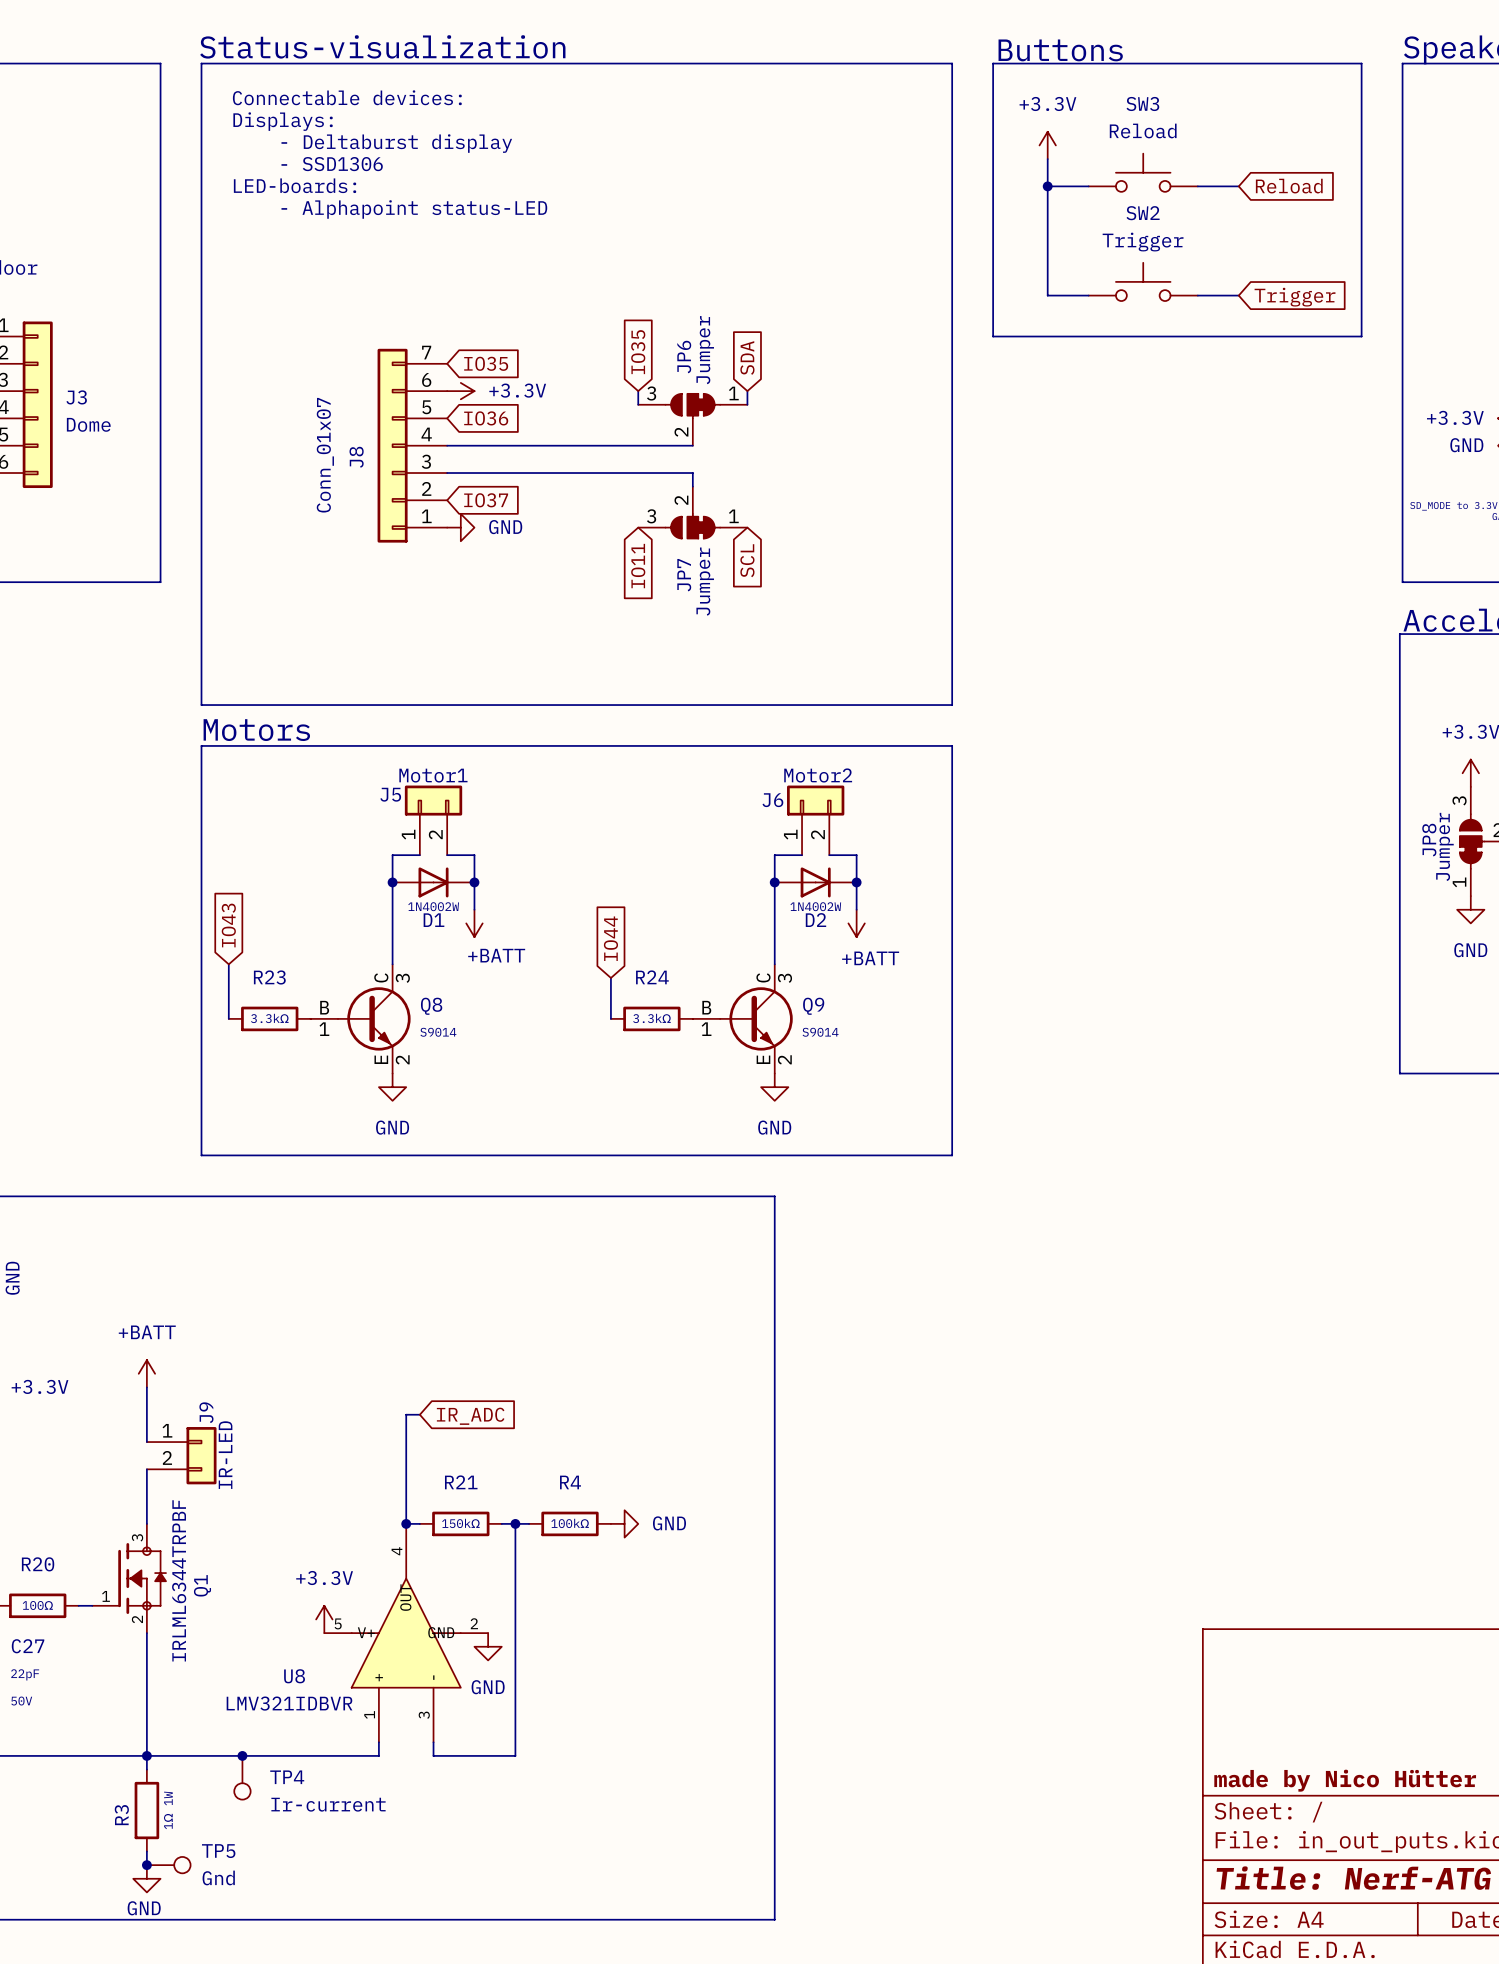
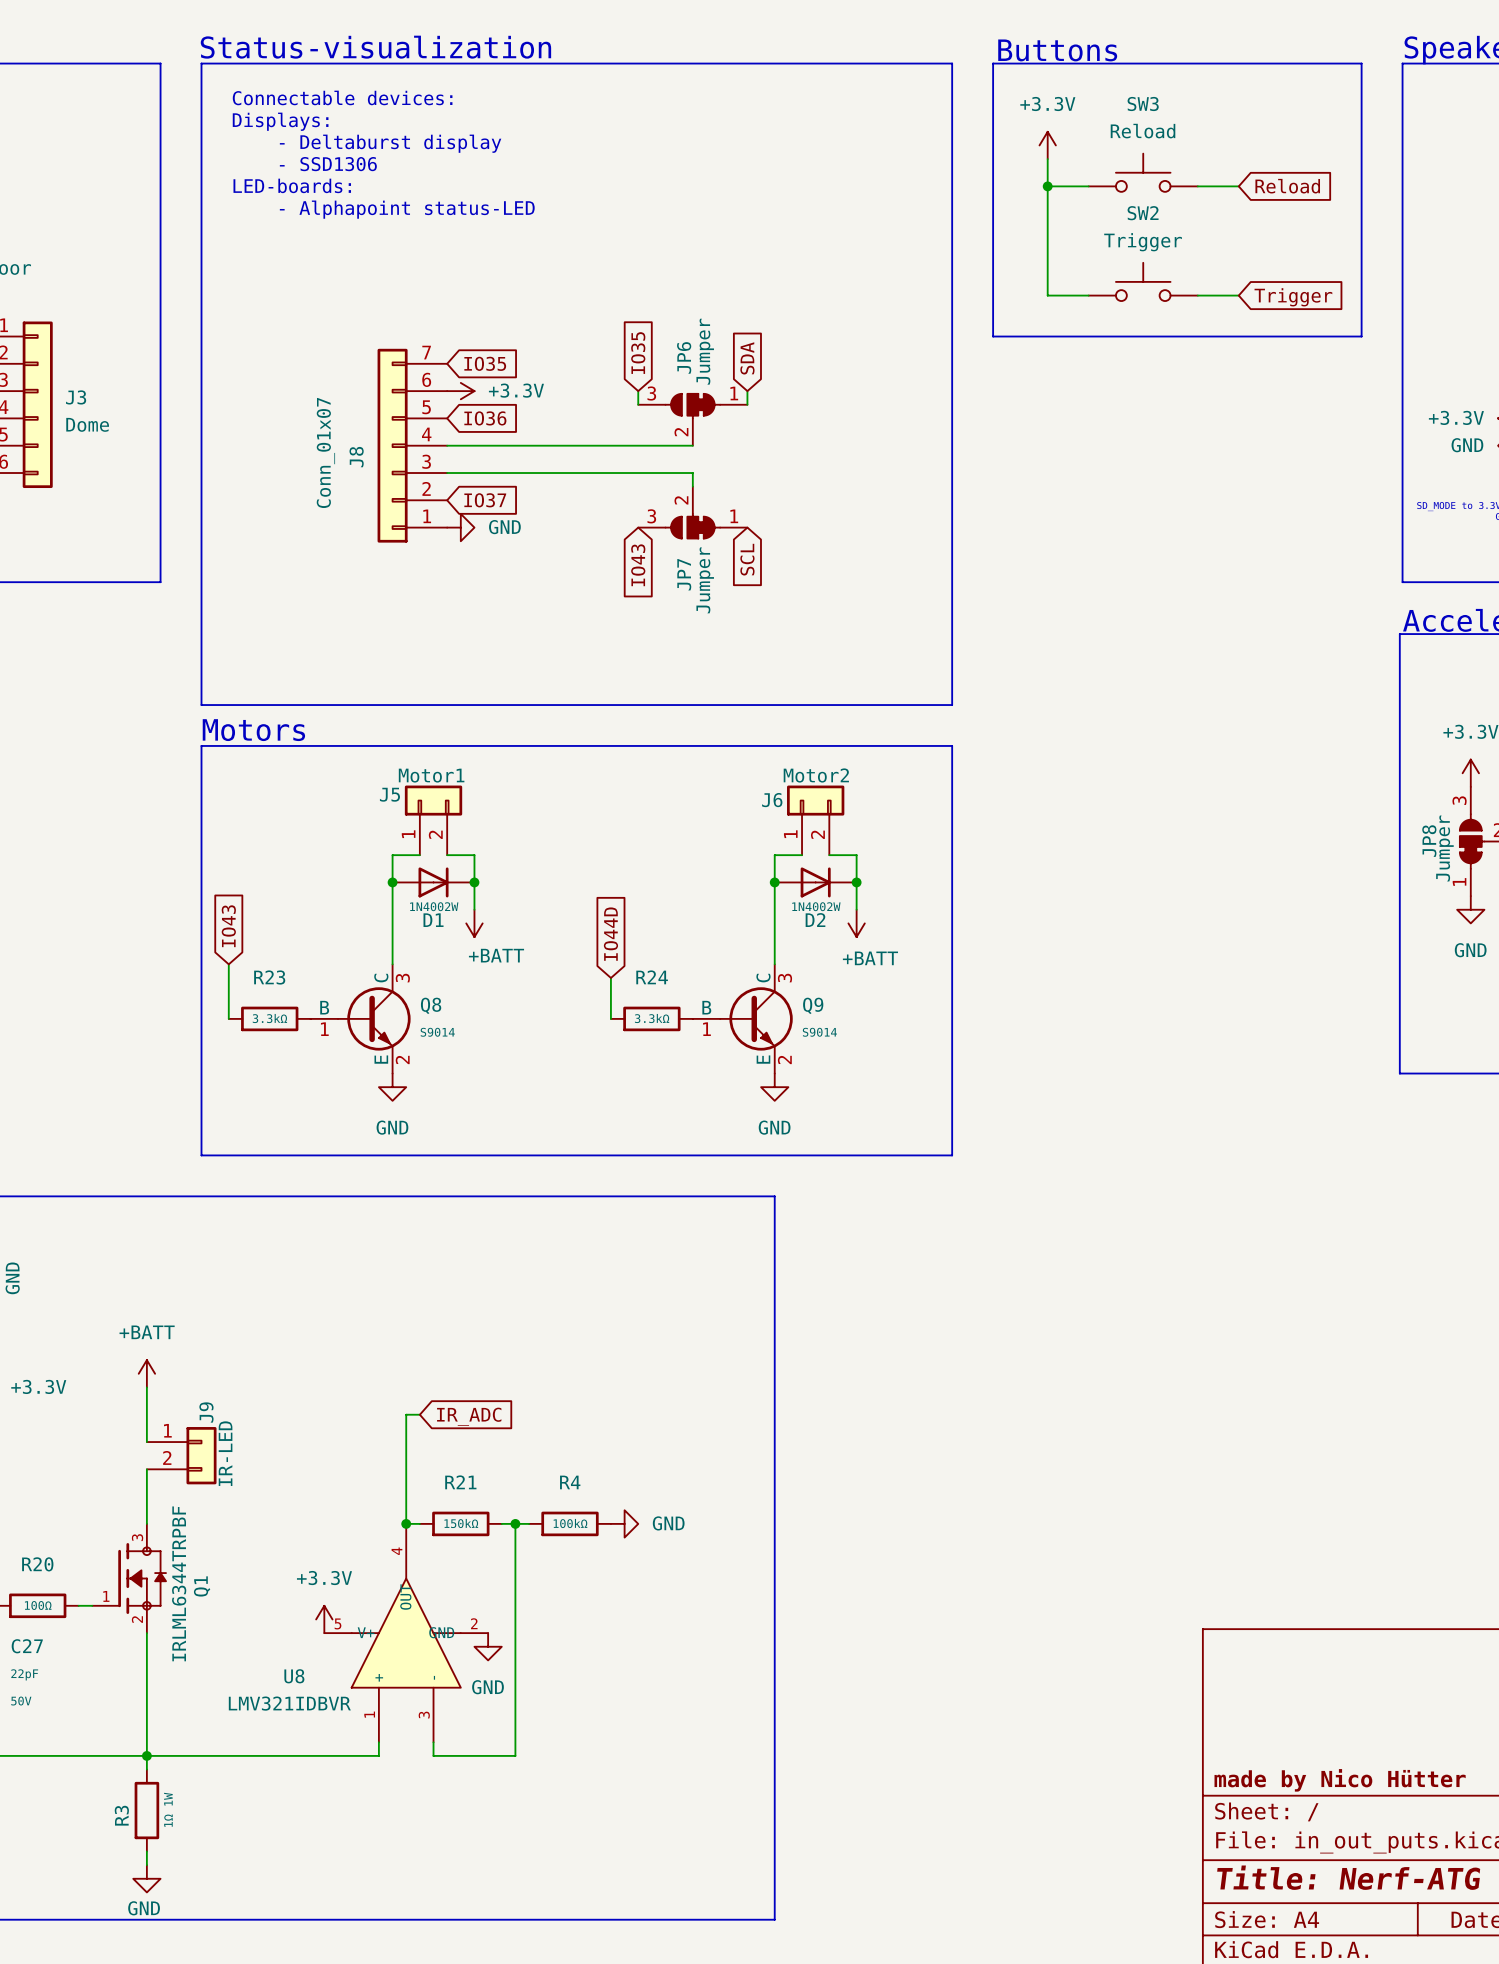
global label: IO11 (638, 566) -> IO43 (638, 565)
global label: IO44 (610, 938) -> IO44D (610, 934)
junction: (242, 1755) -> none
TP4: Ir-current (242, 1777) -> none
junction: (146, 1865) -> none
TP5: Gnd (168, 1865) -> none

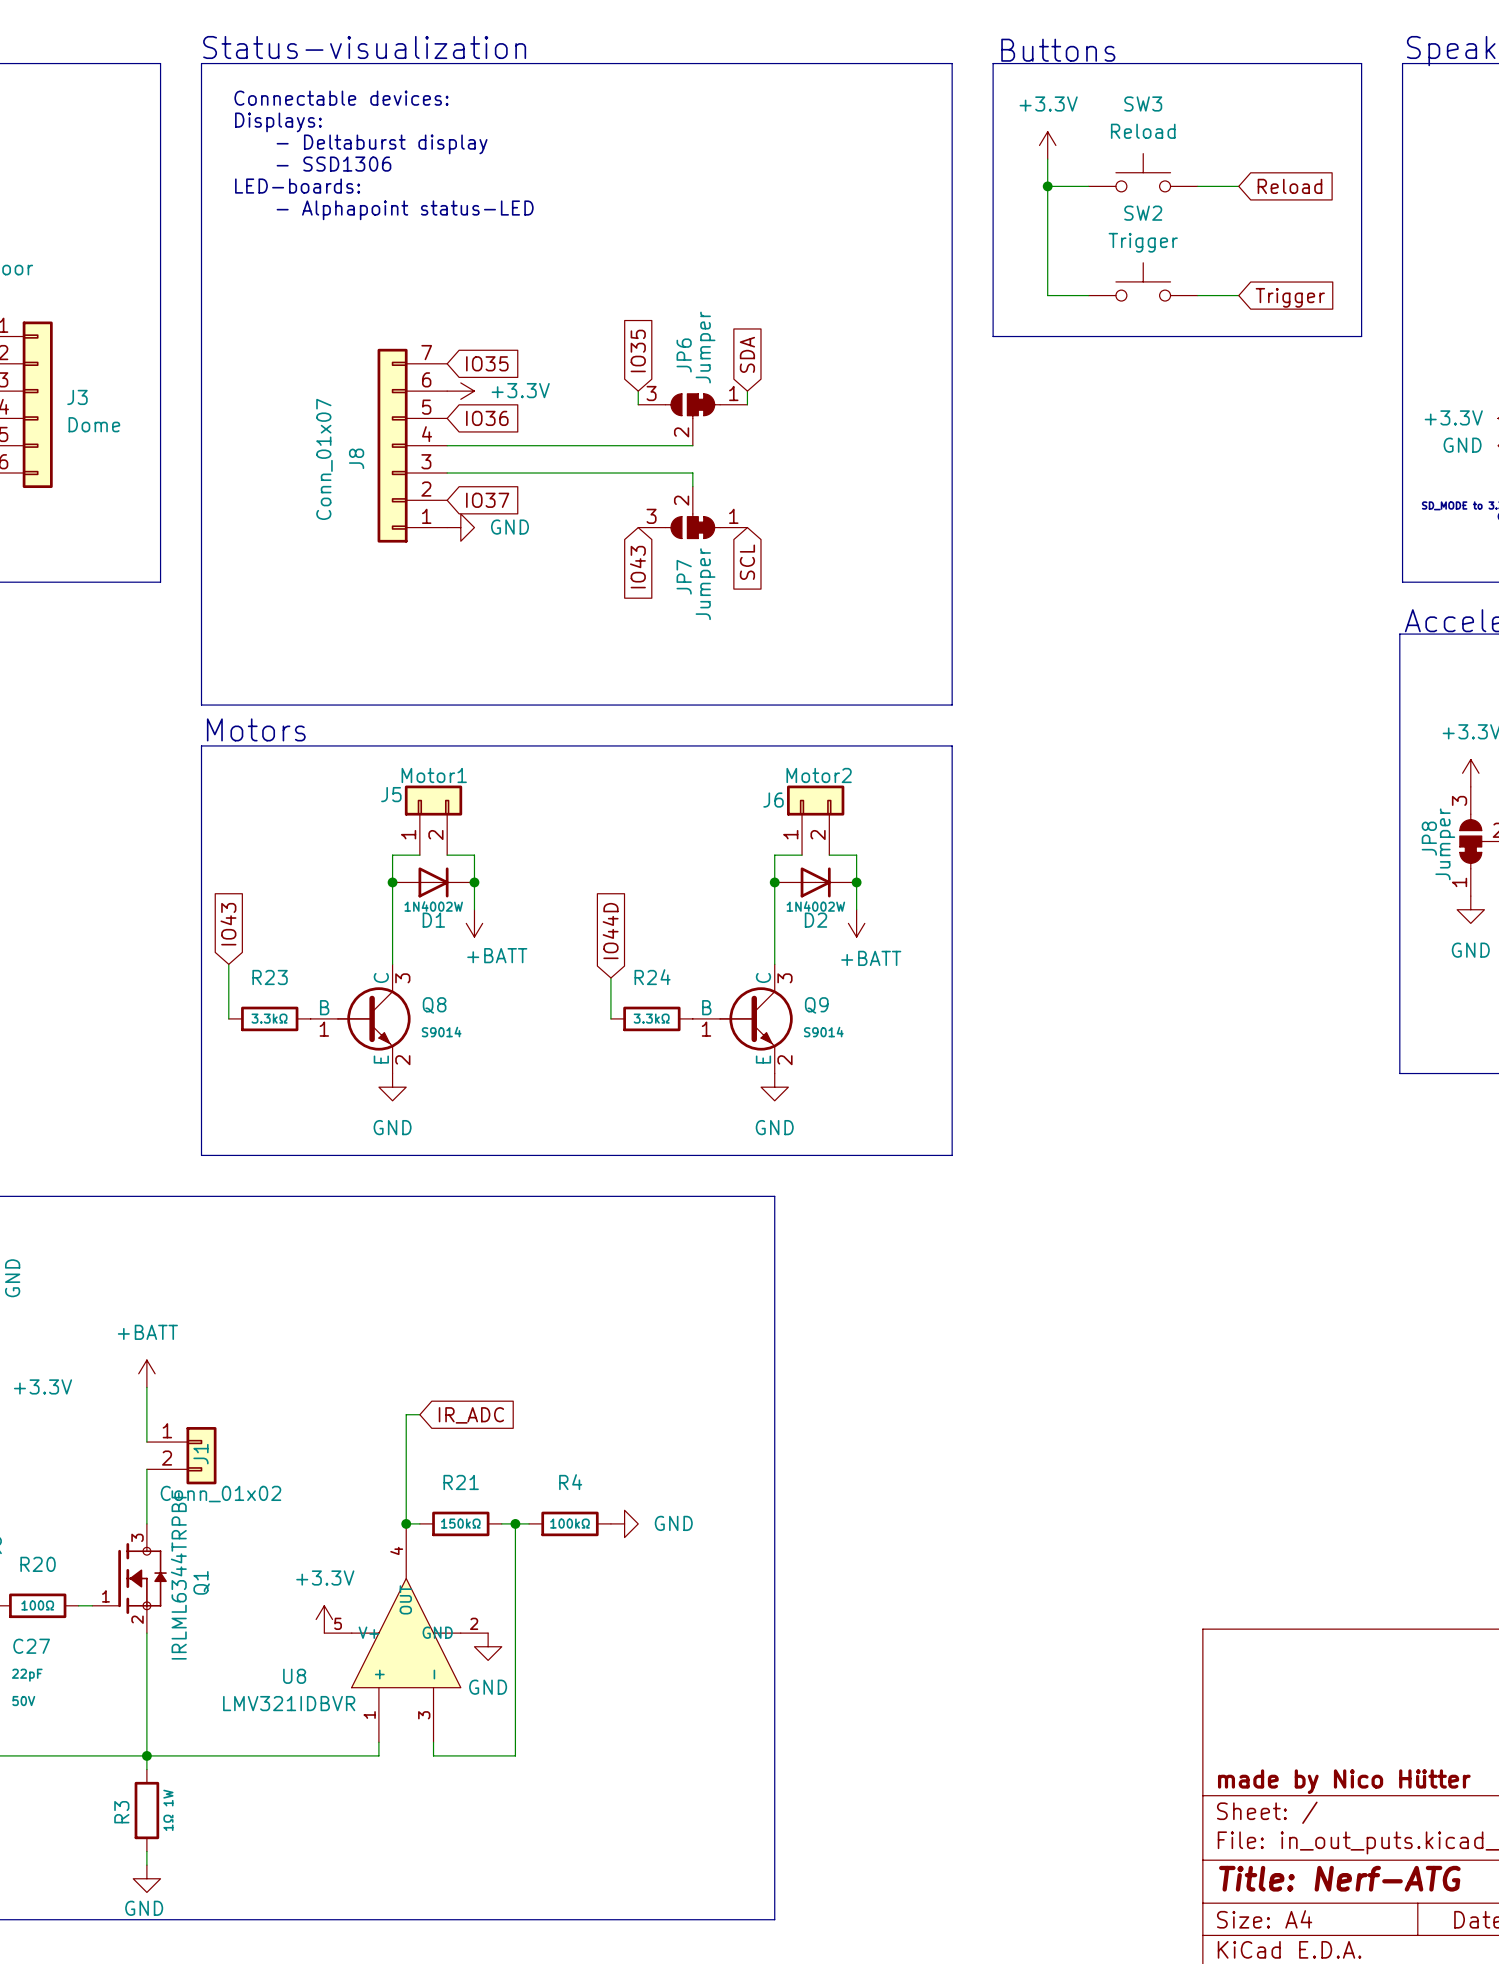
J9 name: J9 (206, 1412) -> J1 (200, 1454)
J9 value: IR-LED (225, 1453) -> Conn_01x02 (220, 1494)

